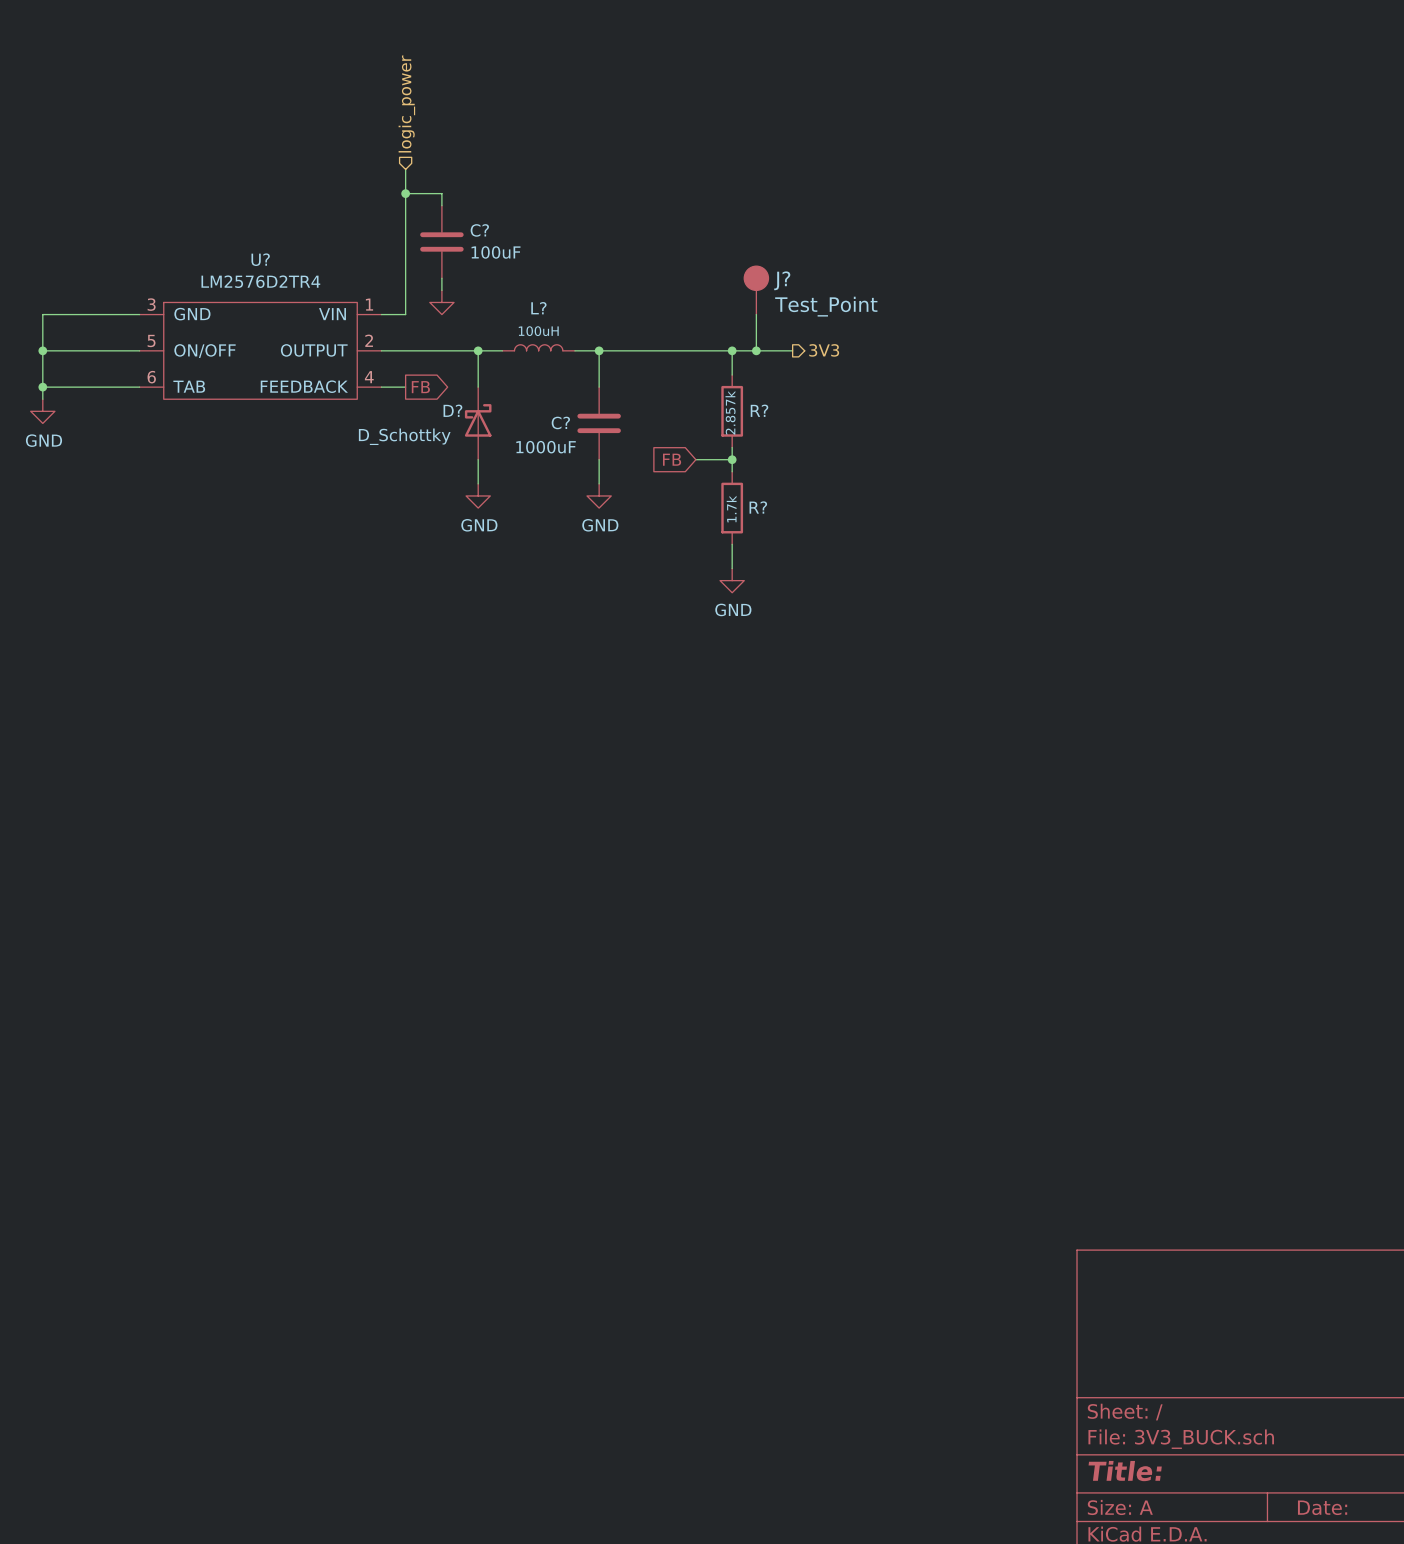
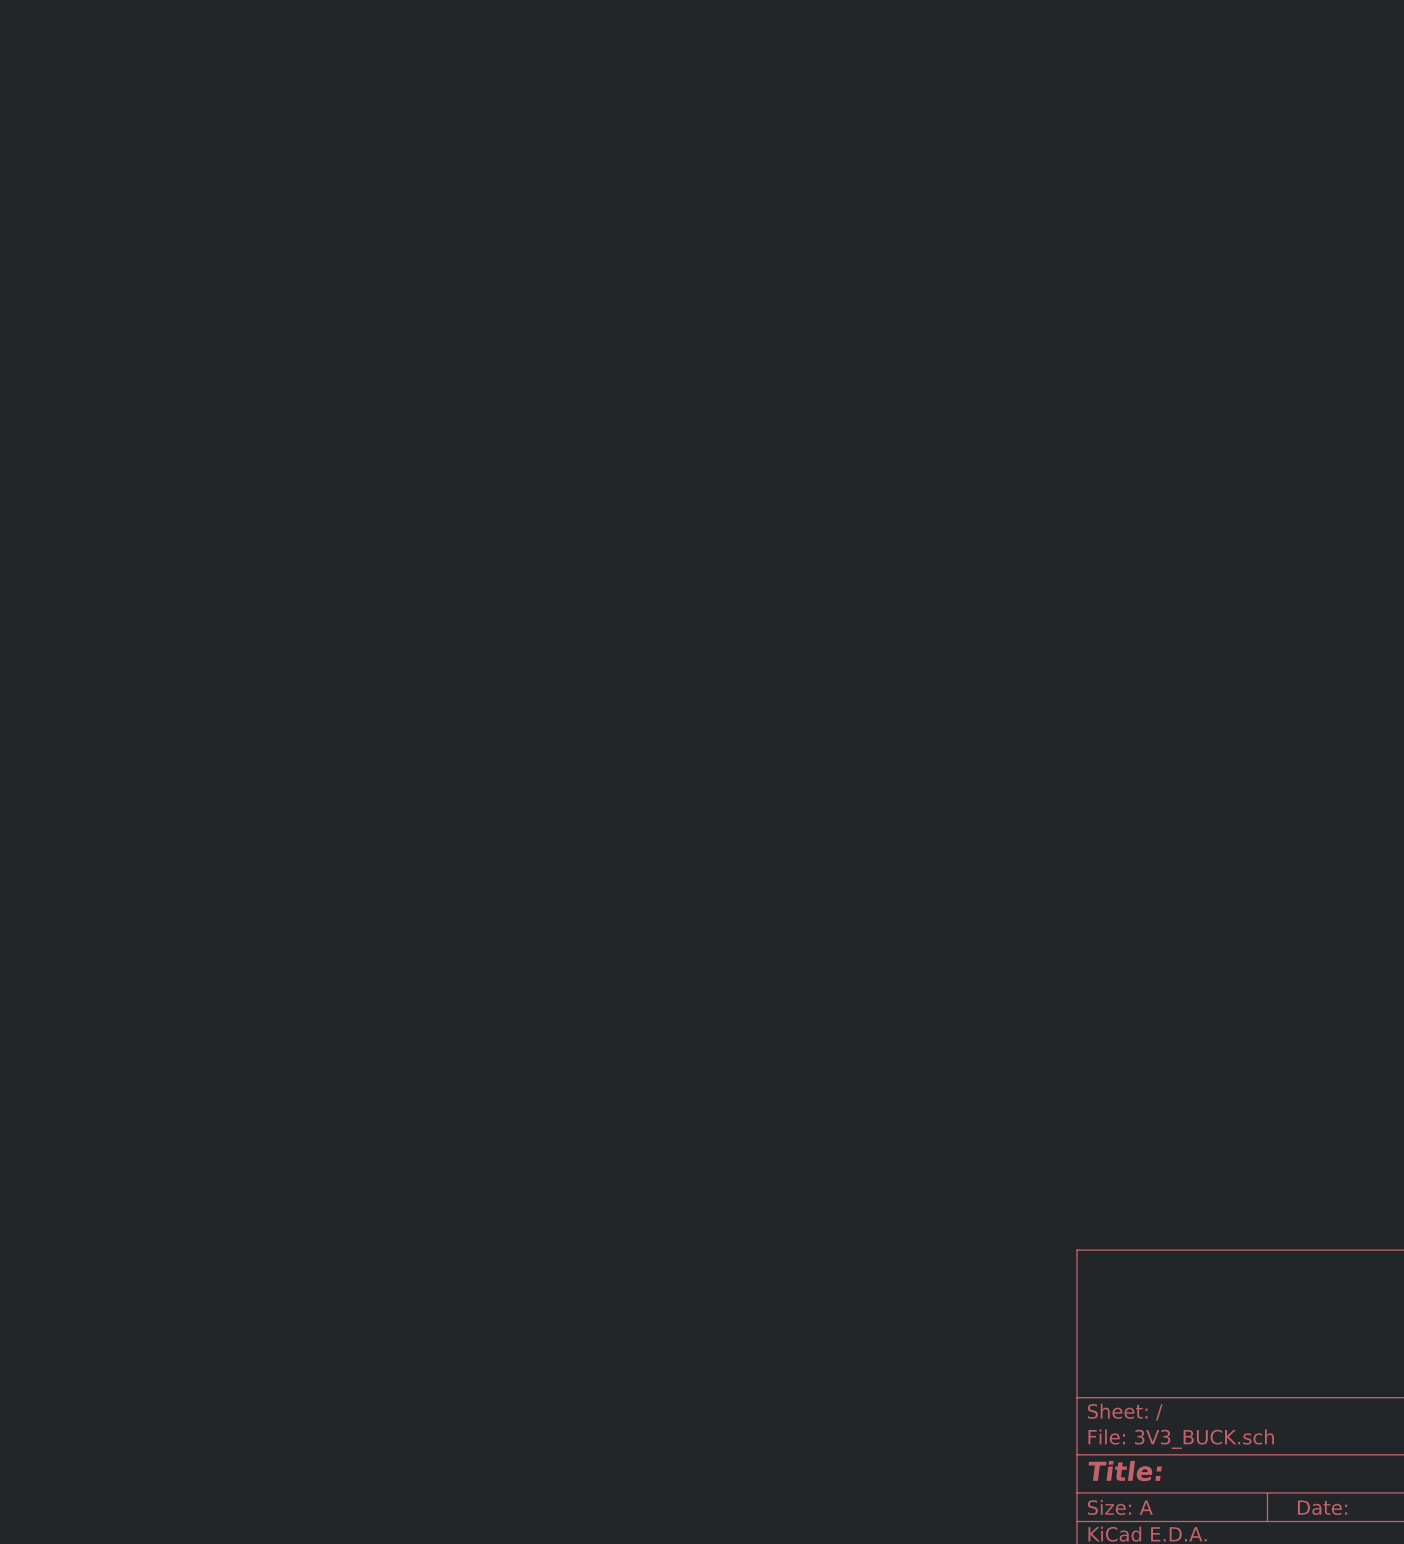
hierarchical label: logic_power (406, 104) -> none
wire: (405, 169) (405, 314) (381, 314) -> none
wire: (405, 193) (441, 193) (441, 205) -> none
junction: (405, 193) -> none
C?: 100uF (441, 242) -> none
wire: (441, 278) (441, 290) -> none
J?: Test_Point (756, 290) -> none
power symbol: (441, 302) -> none
wire: (139, 314) (42, 314) (42, 399) -> none
wire: (756, 314) (756, 350) -> none
L?: 100uH (538, 347) -> none
wire: (42, 350) (139, 350) -> none
junction: (42, 350) -> none
U?: LM2576D2TR4 (260, 350) -> none
wire: (381, 350) (502, 350) -> none
wire: (478, 350) (478, 387) -> none
junction: (478, 350) -> none
wire: (574, 350) (792, 350) -> none
wire: (599, 350) (599, 387) -> none
junction: (599, 350) -> none
wire: (732, 350) (732, 375) -> none
junction: (732, 350) -> none
junction: (756, 350) -> none
hierarchical label: 3V3 (824, 350) -> none
wire: (42, 387) (139, 387) -> none
junction: (42, 387) -> none
wire: (381, 387) (405, 387) -> none
global label: FB (420, 387) -> none
power symbol: GND (42, 411) -> none
R?: 2.857k (732, 411) -> none
D?: D_Schottky (478, 423) -> none
C?: 1000uF (599, 423) -> none
wire: (732, 447) (732, 471) -> none
wire: (478, 459) (478, 483) -> none
wire: (599, 459) (599, 483) -> none
global label: FB (672, 459) -> none
wire: (695, 459) (732, 459) -> none
junction: (732, 459) -> none
power symbol: GND (478, 495) -> none
power symbol: GND (599, 495) -> none
R?: 1.7k (732, 508) -> none
wire: (732, 544) (732, 568) -> none
power symbol: GND (732, 580) -> none

